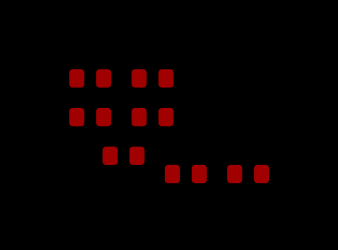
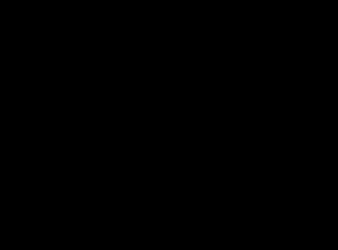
part: (90, 78) -> none
part: (152, 78) -> none
part: (90, 117) -> none
part: (152, 117) -> none
part: (123, 155) -> none
part: (185, 174) -> none
part: (248, 174) -> none

